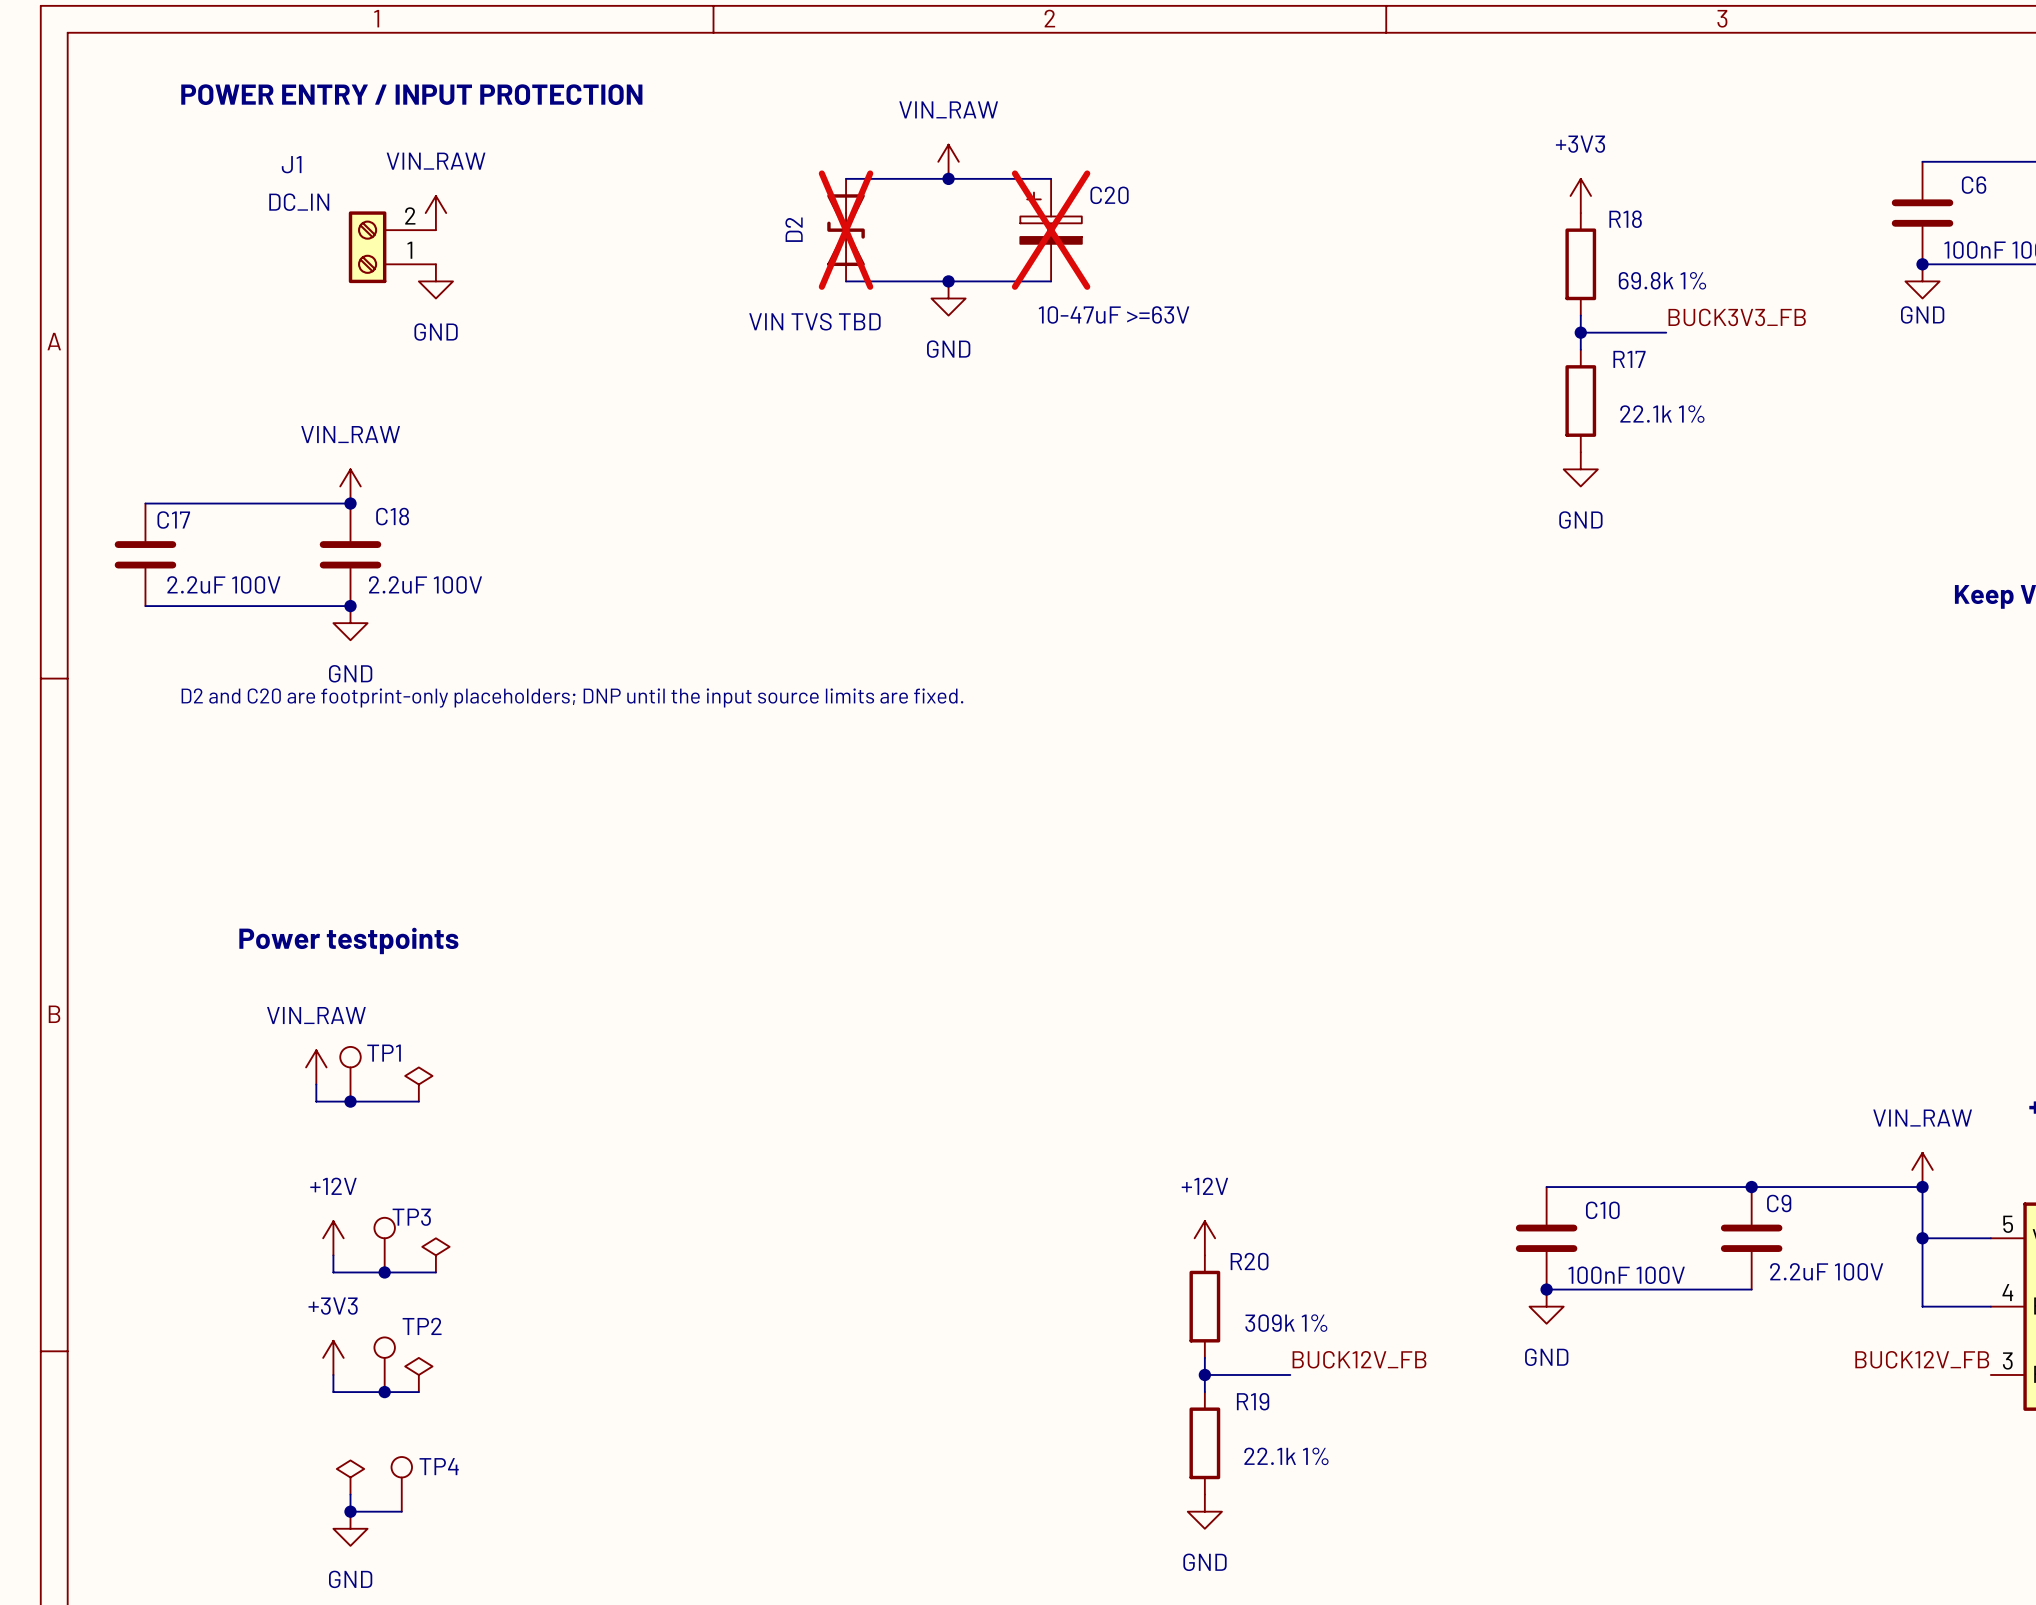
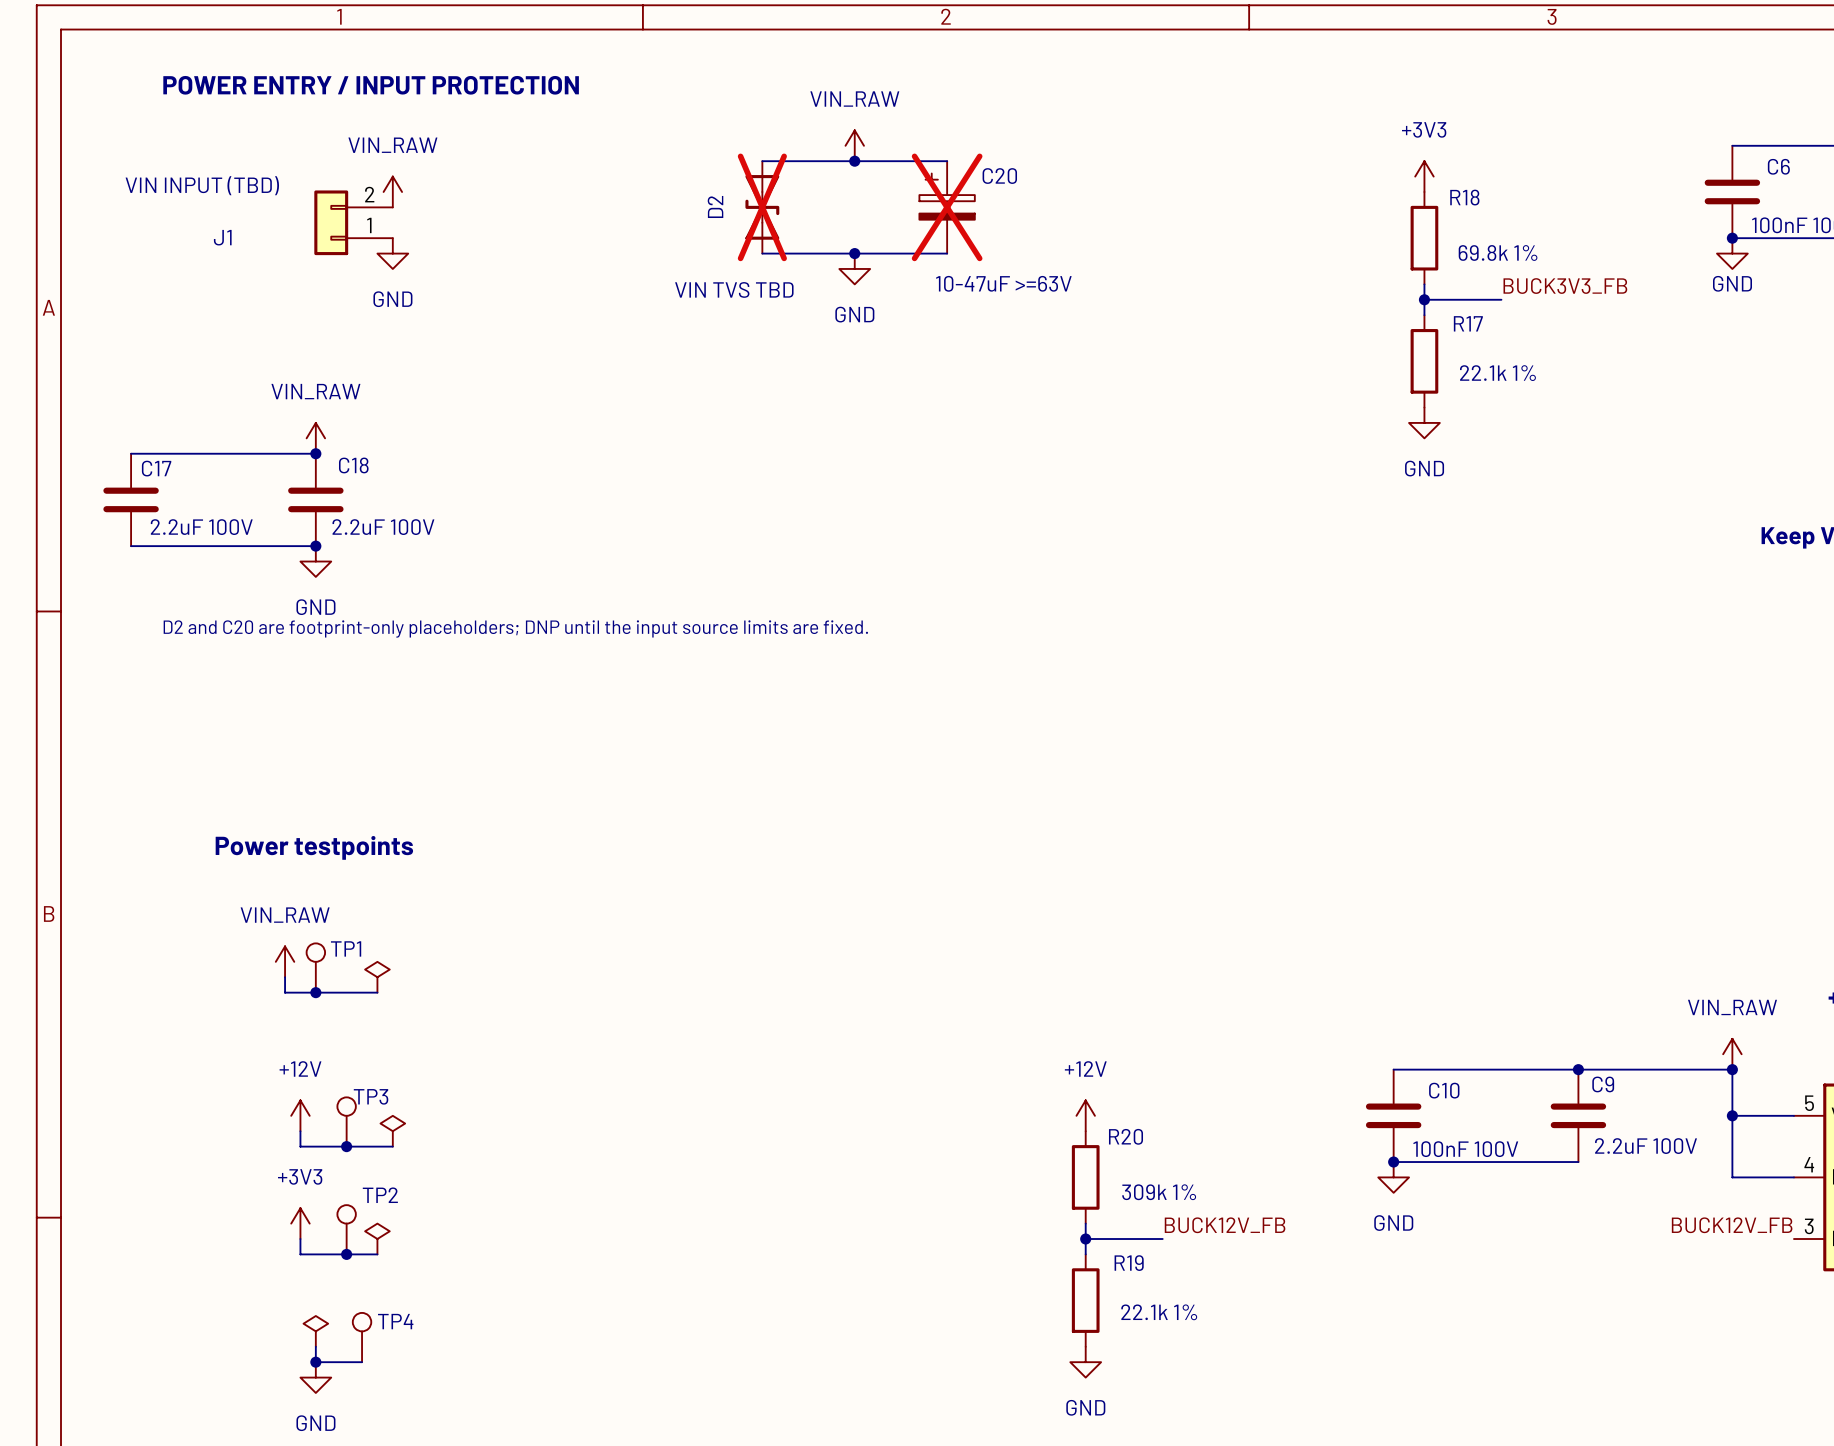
J1 name position: J1 (291, 164) -> J1 (222, 237)
J1 value: DC_IN (299, 202) -> VIN INPUT (TBD) (202, 185)
J1 symbol: [348, 211, 436, 284] -> [314, 190, 393, 256]

